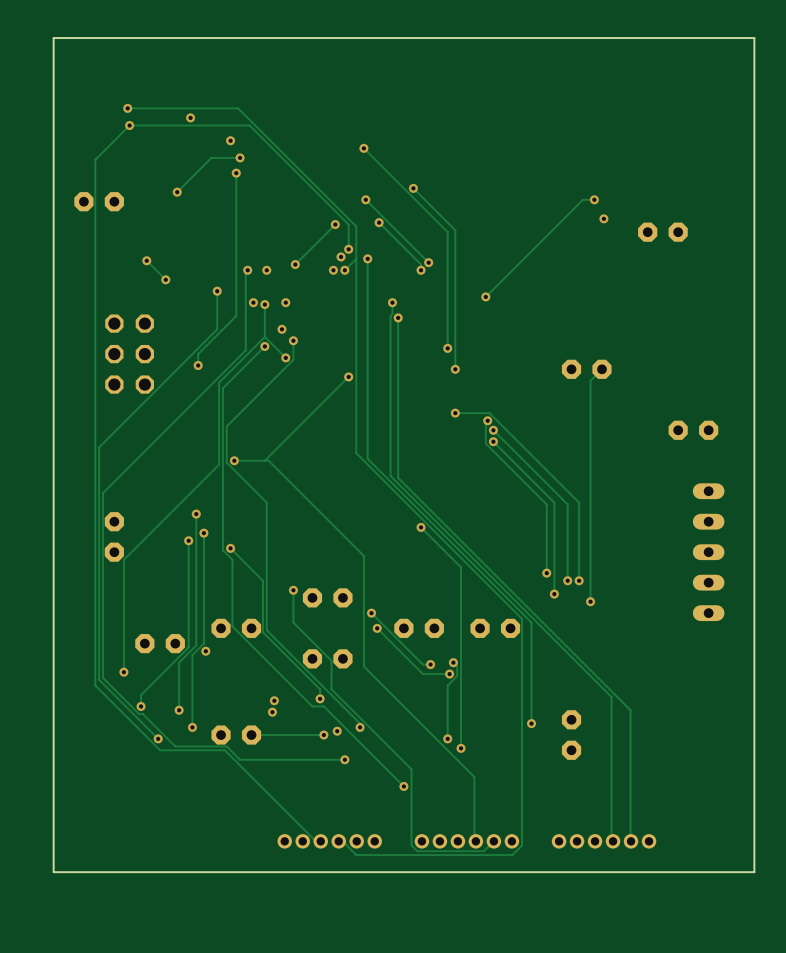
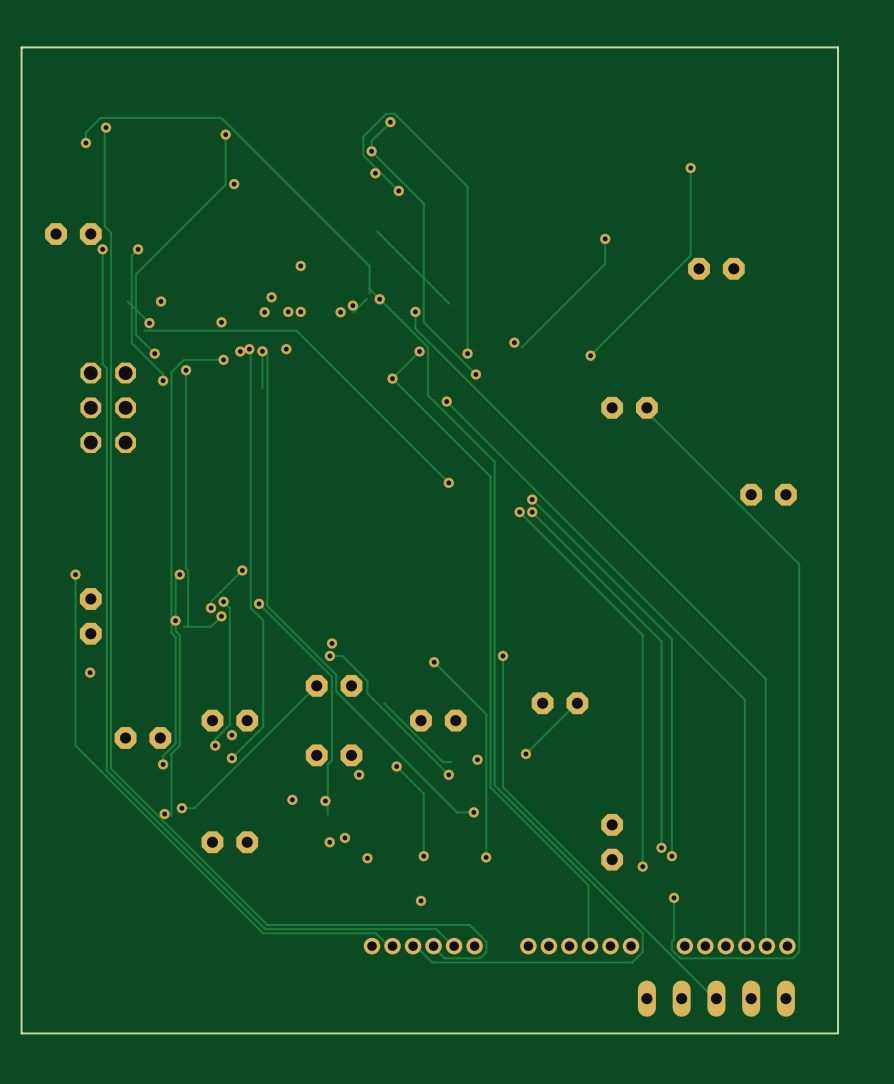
board edge: (754, 38) (754, 872) (53, 872) -> (820, 47) (838, 47) (838, 1033) (21, 1033) (21, 998)
track: none -> (390, 122) (371, 140) (371, 151) (423, 203) (423, 322) (475, 374)
via: none -> (390, 122)
track: none -> (104, 126) (104, 226) (110, 232) (110, 768) (267, 924) (469, 924) (486, 941) (486, 952) (480, 958) (444, 958) (433, 946)
track: (127, 108) (238, 108) (356, 226) (356, 453) (521, 618) (521, 845) (512, 855) (356, 855) (342, 841) (338, 841) -> none
track: none -> (225, 134) (225, 184) (135, 274) (135, 334) (154, 353)
via: none -> (225, 134)
via: (190, 117) -> none
track: none -> (85, 142) (85, 132) (100, 117) (221, 117) (369, 266) (369, 293)
via position: (129, 125) -> (85, 142)
via: none -> (371, 151)
via: (230, 140) -> none
track: none -> (690, 168) (690, 255) (590, 355)
via: none -> (690, 168)
track: (363, 148) (447, 232) (447, 348) -> none
track: (240, 157) (211, 157) (177, 192) -> none
track: none -> (398, 190) (363, 155) (363, 136) (386, 113) (394, 113) (467, 186) (467, 353)
via: none -> (398, 190)
track: (236, 173) (236, 315) (198, 354) (198, 365) -> none
via: (236, 173) -> none
track: (413, 188) (455, 230) (455, 369) -> none
via: (413, 188) -> none
via: (177, 192) -> none
via: (365, 199) -> none
track: (594, 199) (582, 199) (485, 296) -> none
via: (594, 199) -> none
track: none -> (605, 238) (605, 263) (521, 347)
via: none -> (605, 238)
track: none -> (102, 249) (102, 364) (106, 368) (106, 770) (265, 929) (436, 929) (454, 946)
via: none -> (102, 249)
track: none -> (138, 249) (131, 255) (131, 343) (163, 374) (163, 380)
via: none -> (138, 249)
via: (603, 218) -> none
track: (379, 222) (421, 264) (421, 270) -> none
via: (379, 222) -> none
track: (335, 224) (295, 264) -> none
via: (335, 224) -> none
via: none -> (300, 266)
track: (348, 249) (348, 224) (249, 125) (129, 125) (95, 159) (95, 685) (160, 750) (224, 750) (314, 839) (320, 841) -> none
via: (348, 249) -> none
track: none -> (369, 288) (427, 347) (427, 395) (494, 462) (494, 785) (642, 933) (642, 952) (632, 962) (432, 962) (417, 947) (413, 947) (413, 946)
via: (341, 256) -> none
via: none -> (271, 297)
track: (367, 258) (367, 458) (531, 622) (531, 723) -> none
via: (146, 260) -> none
via: none -> (161, 301)
via: (428, 262) -> none
via: (295, 264) -> none
via: none -> (352, 305)
via: none -> (288, 311)
via: none -> (300, 311)
track: none -> (415, 311) (415, 328) (765, 678) (766, 946)
via: none -> (415, 311)
track: (247, 270) (245, 272) (245, 350) (102, 493) (102, 677) (175, 746) (226, 746) (240, 759) (344, 759) -> none
via: (247, 270) -> none
via: (344, 270) -> none
via: (421, 270) -> none
via: none -> (221, 322)
track: none -> (144, 330) (296, 330) (448, 482)
track: (217, 291) (217, 329) (99, 447) (99, 679) (158, 738) -> none
via: (217, 291) -> none
track: (392, 302) (392, 314) (390, 315) (390, 475) (611, 696) (613, 841) -> none
via: (392, 302) -> none
via: none -> (240, 351)
track: none -> (252, 351) (250, 353) (250, 608) (263, 620) (263, 726) (231, 758)
track: none -> (265, 351) (267, 353) (267, 605) (336, 674) (336, 691) (457, 812) (473, 812)
track: none -> (419, 351) (392, 378) (490, 476) (490, 787) (588, 885) (589, 946)
via: none -> (419, 351)
via: none -> (154, 353)
via: none -> (467, 353)
via: none -> (590, 355)
track: none -> (223, 359) (183, 359) (171, 372) (171, 633) (175, 637) (175, 743) (163, 756) (163, 764)
via: none -> (223, 359)
track: (398, 317) (398, 477) (630, 710) (631, 841) -> none
via: (398, 317) -> none
track: none -> (186, 370) (186, 568) (188, 570) (188, 626)
via: none -> (186, 370)
via: none -> (475, 374)
via: none -> (392, 378)
via: (281, 329) -> none
via: none -> (163, 380)
track: (293, 340) (293, 359) (226, 426) (226, 462) (266, 502) (266, 630) (360, 723) (360, 727) -> none
via: (293, 340) -> none
track: (264, 346) (222, 388) (222, 550) (232, 559) (232, 626) (312, 706) (323, 706) (403, 786) -> none
via: (264, 346) -> none
track: none -> (446, 401) (744, 699) (746, 946)
via: none -> (446, 401)
via: (447, 348) -> none
track: none -> (646, 407) (646, 411) (799, 564) (799, 952) (792, 958) (680, 958) (671, 950) (671, 941) (674, 939) (674, 897)
track: (285, 357) (264, 336) (219, 382) (219, 464) (123, 559) (123, 672) -> none
via: (285, 357) -> none
via: (198, 365) -> none
via: (455, 369) -> none
part position: (586, 369) -> (629, 407)
track: (601, 369) (590, 380) (590, 601) -> none
track: (348, 376) (264, 460) -> none
via: (348, 376) -> none
track: (455, 413) (489, 413) (579, 502) (579, 580) -> none
via: (455, 413) -> none
via: none -> (448, 482)
track: (487, 420) (485, 422) (485, 443) (546, 504) (546, 573) -> none
via: (487, 420) -> none
track: (493, 430) (567, 504) (567, 580) -> none
via: (493, 430) -> none
part position: (693, 430) -> (768, 494)
track: none -> (532, 499) (671, 639) (671, 856)
via: none -> (532, 499)
track: (493, 441) (554, 502) (554, 594) -> none
via: (493, 441) -> none
track: none -> (519, 512) (642, 635) (642, 866)
via: none -> (519, 512)
track: none -> (532, 512) (661, 641) (661, 847)
via: none -> (532, 512)
track: (234, 460) (268, 460) (363, 555) (363, 666) (474, 776) (475, 841) -> none
via: (234, 460) -> none
track: none -> (242, 570) (211, 601) (211, 608)
via: none -> (242, 570)
track: none -> (75, 574) (75, 745) (263, 933) (375, 933) (388, 945) (392, 946)
via: none -> (75, 574)
track: none -> (179, 574) (175, 578) (175, 630) (179, 635) (179, 745) (171, 753) (171, 816)
via: none -> (179, 574)
track: (196, 514) (196, 645) (179, 662) (179, 710) -> none
via: (196, 514) -> none
track: none -> (223, 601) (229, 608) (229, 724) (215, 739) (215, 745)
via: none -> (223, 601)
track: none -> (259, 603) (332, 676) (332, 760) (327, 764) (327, 814)
via: none -> (259, 603)
track: (421, 527) (461, 567) (461, 748) -> none
via: (421, 527) -> none
via: none -> (211, 608)
track: (203, 533) (203, 643) (192, 655) (192, 727) -> none
via: (203, 533) -> none
track: none -> (221, 616) (211, 626) (183, 626)
via: none -> (221, 616)
track: (188, 540) (188, 647) (141, 695) (141, 706) -> none
track: (230, 548) (262, 580) (262, 632) (320, 689) (320, 698) -> none
via: (230, 548) -> none
part: (708, 552) -> none
via: none -> (332, 643)
track: none -> (329, 655) (342, 655) (367, 681) (367, 693) (448, 774)
via: none -> (329, 655)
track: none -> (503, 655) (503, 787) (715, 1000) (716, 998)
via: none -> (503, 655)
via: (546, 573) -> none
track: none -> (434, 662) (486, 714) (486, 856)
via: none -> (434, 662)
via: (567, 580) -> none
via: (579, 580) -> none
via: none -> (90, 672)
track: (293, 590) (293, 622) (331, 660) (331, 689) (411, 769) (411, 845) (417, 851) (483, 851) (493, 841) -> none
via: (293, 590) -> none
via: (554, 594) -> none
track: none -> (316, 685) (194, 808) (181, 808)
via: (590, 601) -> none
via: (371, 613) -> none
track: none -> (577, 703) (525, 753)
track: (377, 628) (422, 674) (449, 674) -> none
via: (377, 628) -> none
part position: (495, 628) -> (560, 703)
via: none -> (231, 735)
via: none -> (215, 745)
via: (205, 651) -> none
via: none -> (525, 753)
via: none -> (231, 758)
track: (453, 662) (457, 666) (457, 675) (447, 685) (447, 738) -> none
via: (430, 664) -> none
via: none -> (163, 764)
track: none -> (396, 766) (423, 793) (423, 856)
via: none -> (396, 766)
via: (123, 672) -> none
via: (449, 674) -> none
via: none -> (359, 774)
via: none -> (448, 774)
via: none -> (292, 799)
via: (274, 700) -> none
via: (141, 706) -> none
via: none -> (473, 812)
via: (272, 712) -> none
via: (531, 723) -> none
via position: (192, 727) -> (181, 808)
via: (360, 727) -> none
track: (323, 735) (251, 735) -> none
via: (158, 738) -> none
via: (447, 738) -> none
via: none -> (661, 847)
via: none -> (423, 856)
via: none -> (671, 856)
via: none -> (367, 858)
via: none -> (642, 866)
via: (344, 759) -> none
via: none -> (674, 897)
part: none -> (423, 946)
part: none -> (579, 946)
part: none -> (736, 946)
part: (329, 841) -> none
part: (466, 841) -> none
part: (604, 841) -> none
part: none -> (716, 998)

